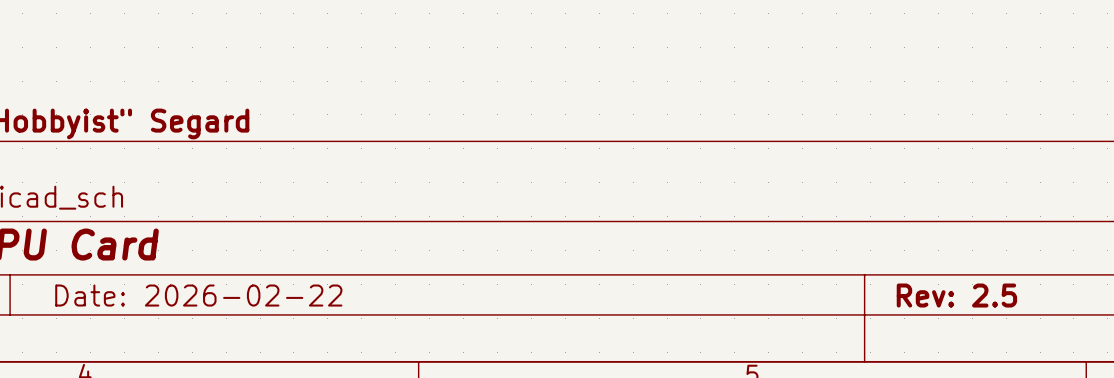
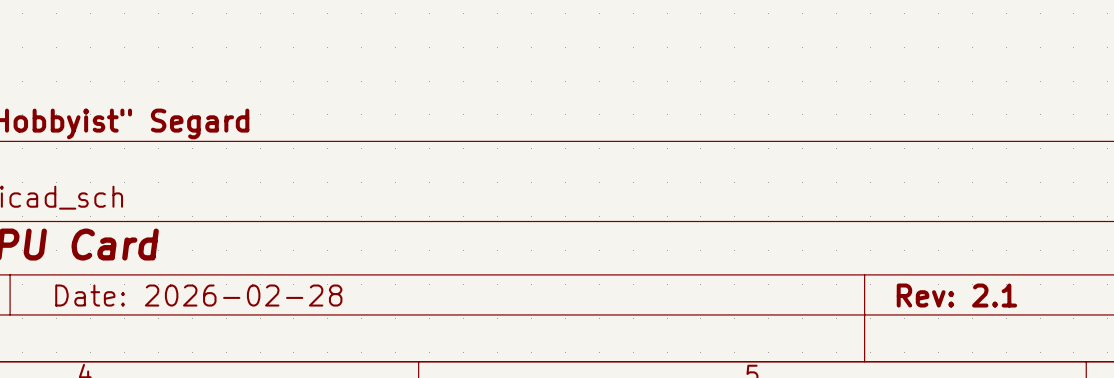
title block: Date: 2026-02-22 (198, 295) -> Date: 2026-02-28 (198, 295)
title block: Rev: 2.5 (956, 295) -> Rev: 2.1 (956, 295)

